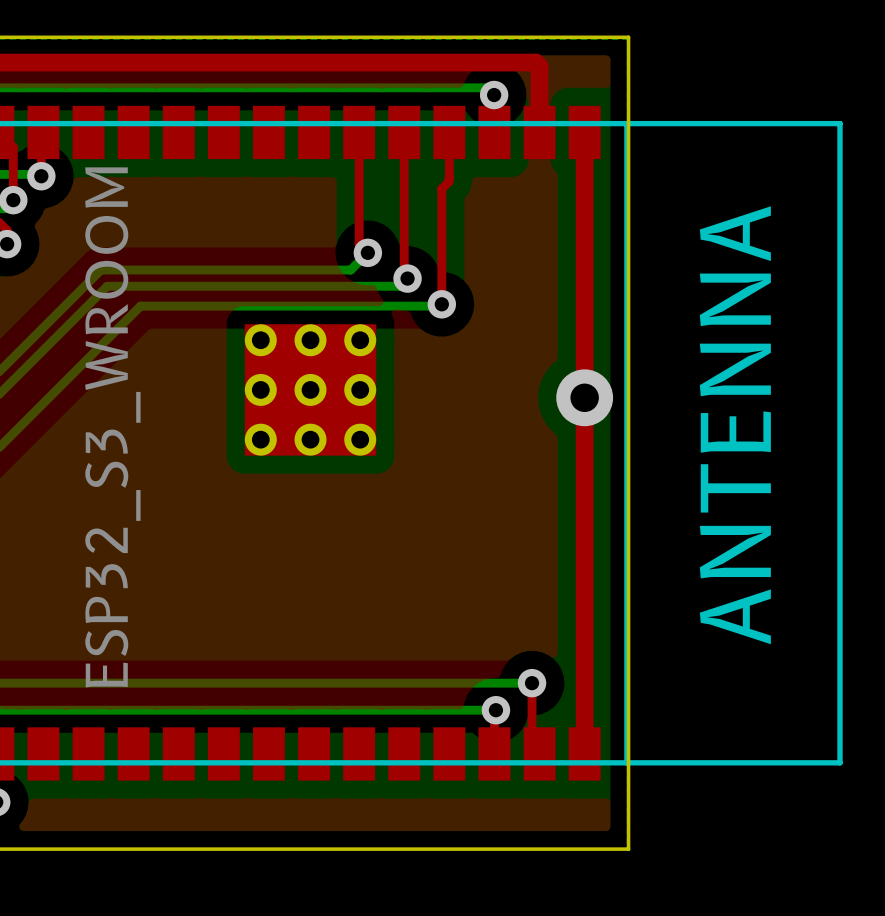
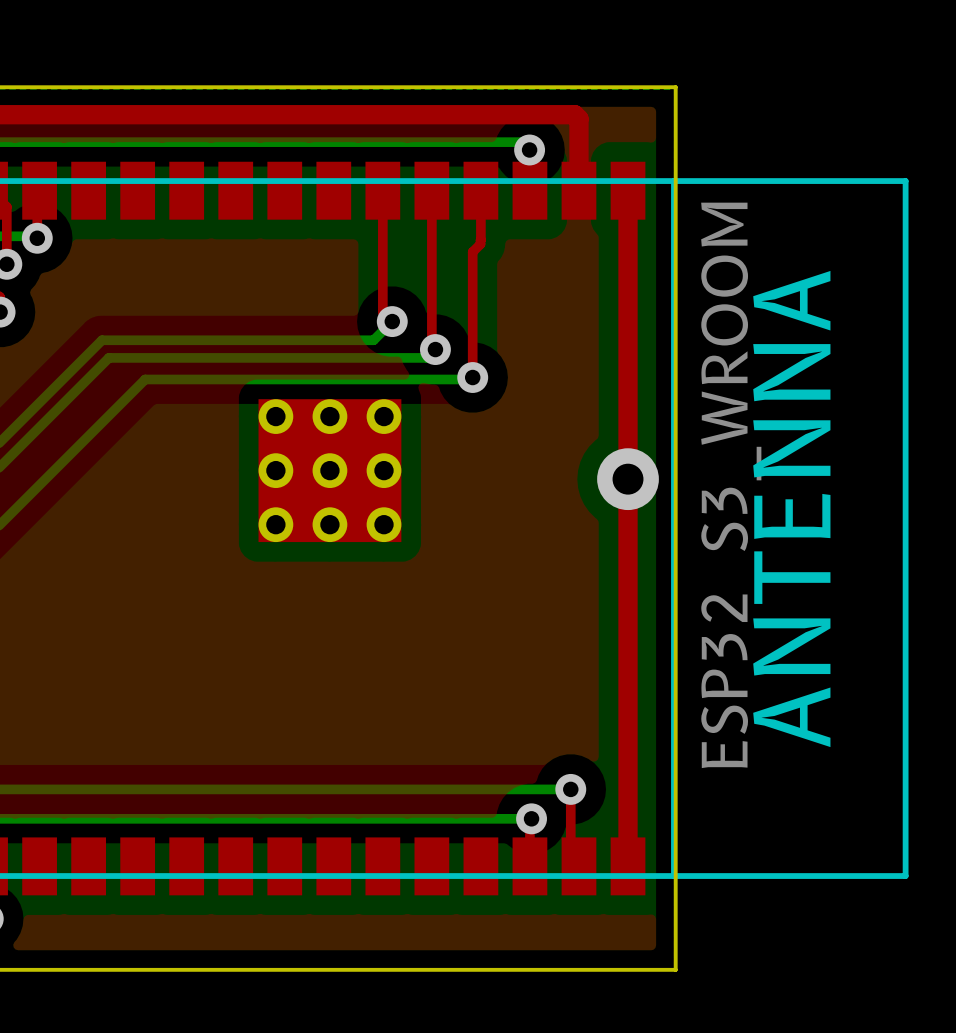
part value position: ESP32_S3_WROOM (112, 427) -> ESP32_S3_WROOM (731, 485)

